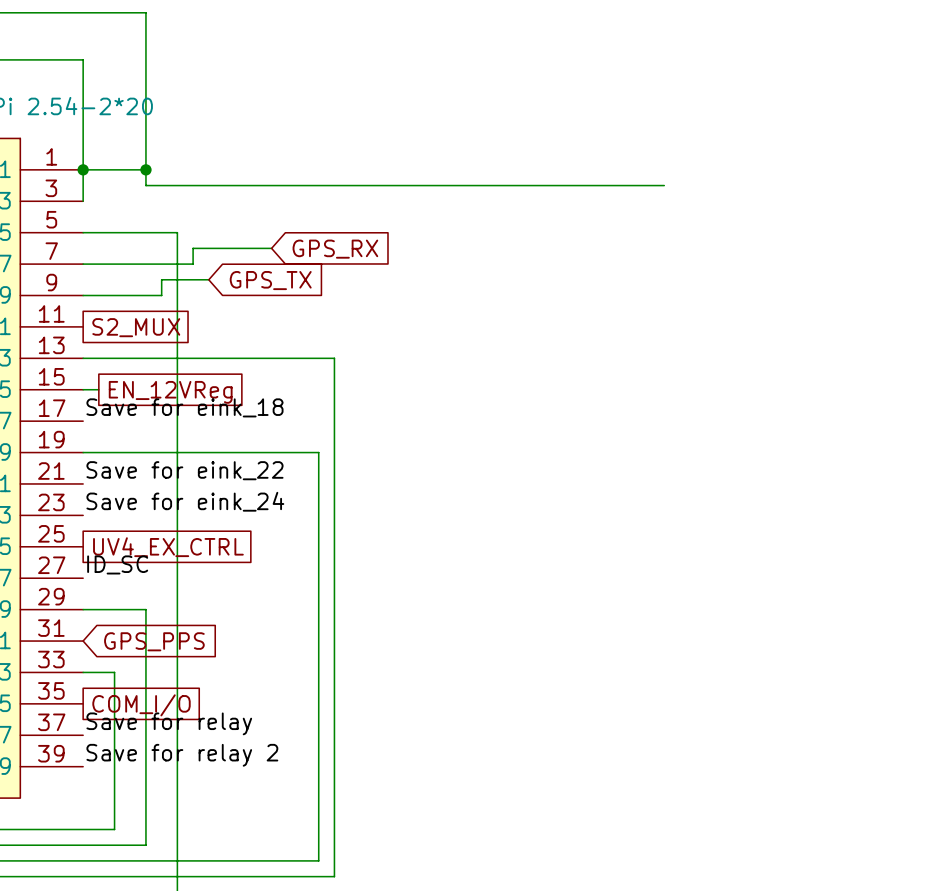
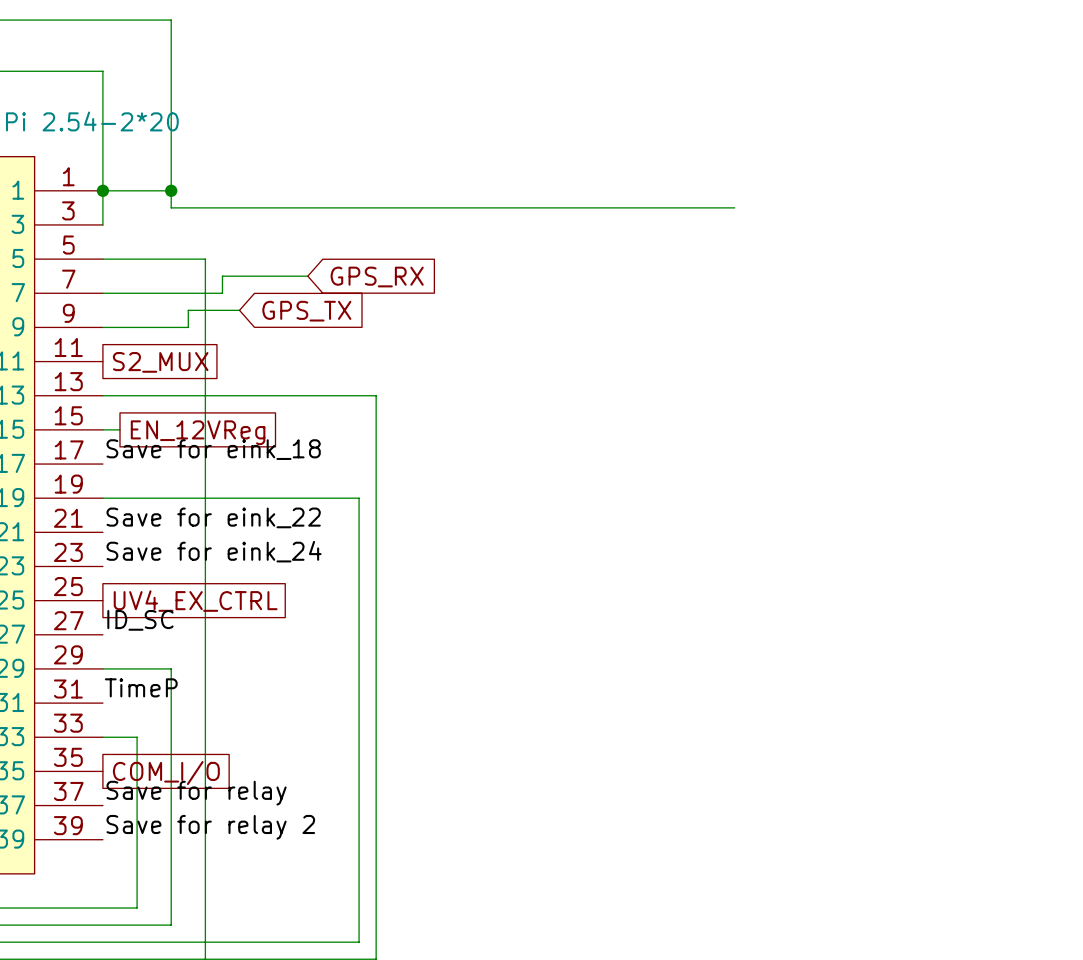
label: none -> TimeP (141, 687)
global label: GPS_PPS (154, 641) -> none

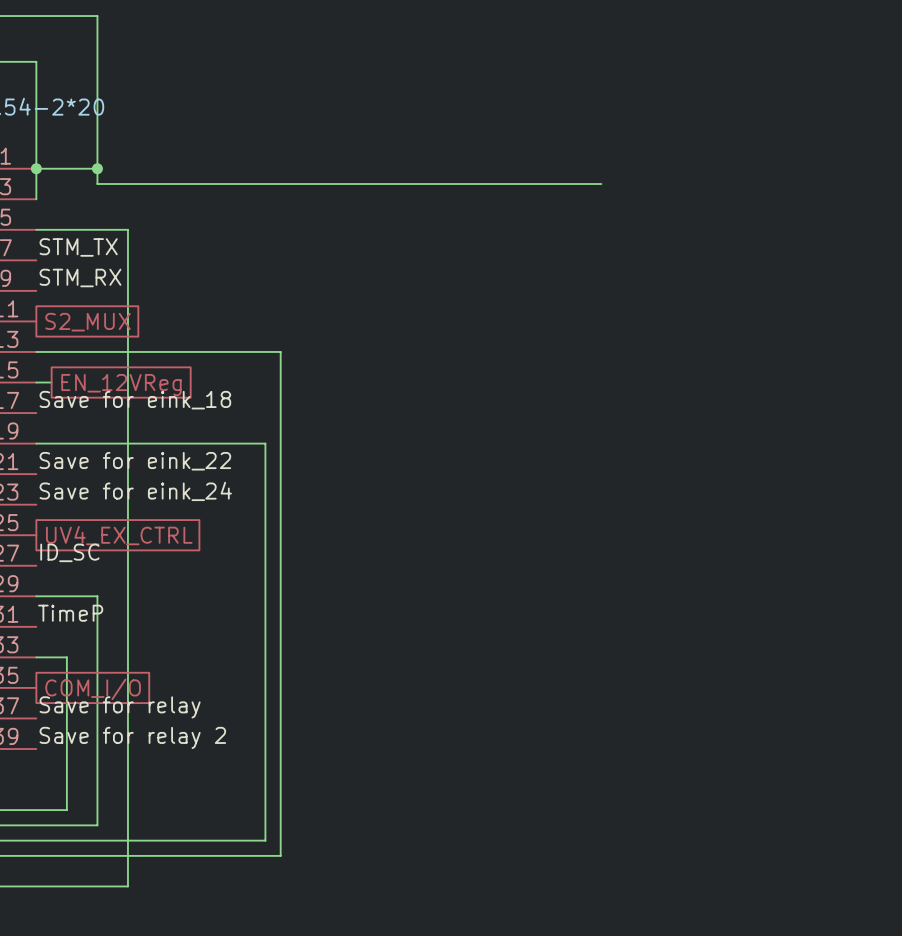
wire: (307, 276) (222, 276) (222, 293) (102, 293) -> none
global label: GPS_RX (377, 277) -> none
label: none -> STM_TX (78, 247)
wire: (239, 310) (188, 310) (188, 327) (102, 327) -> none
global label: GPS_TX (306, 311) -> none
label: none -> STM_RX (80, 277)

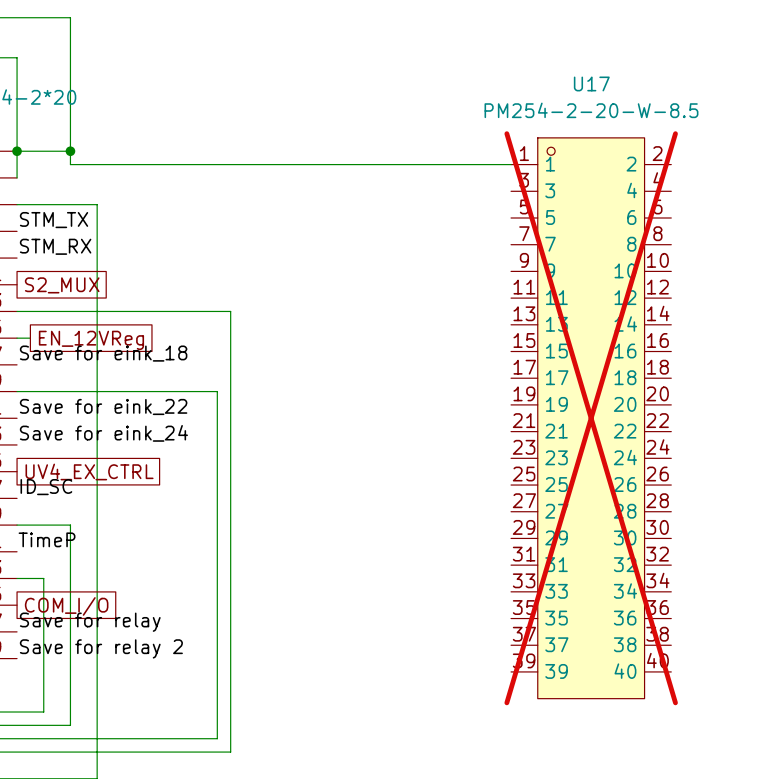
U17: none -> PM254-2-20-W-8.5 (591, 418)

